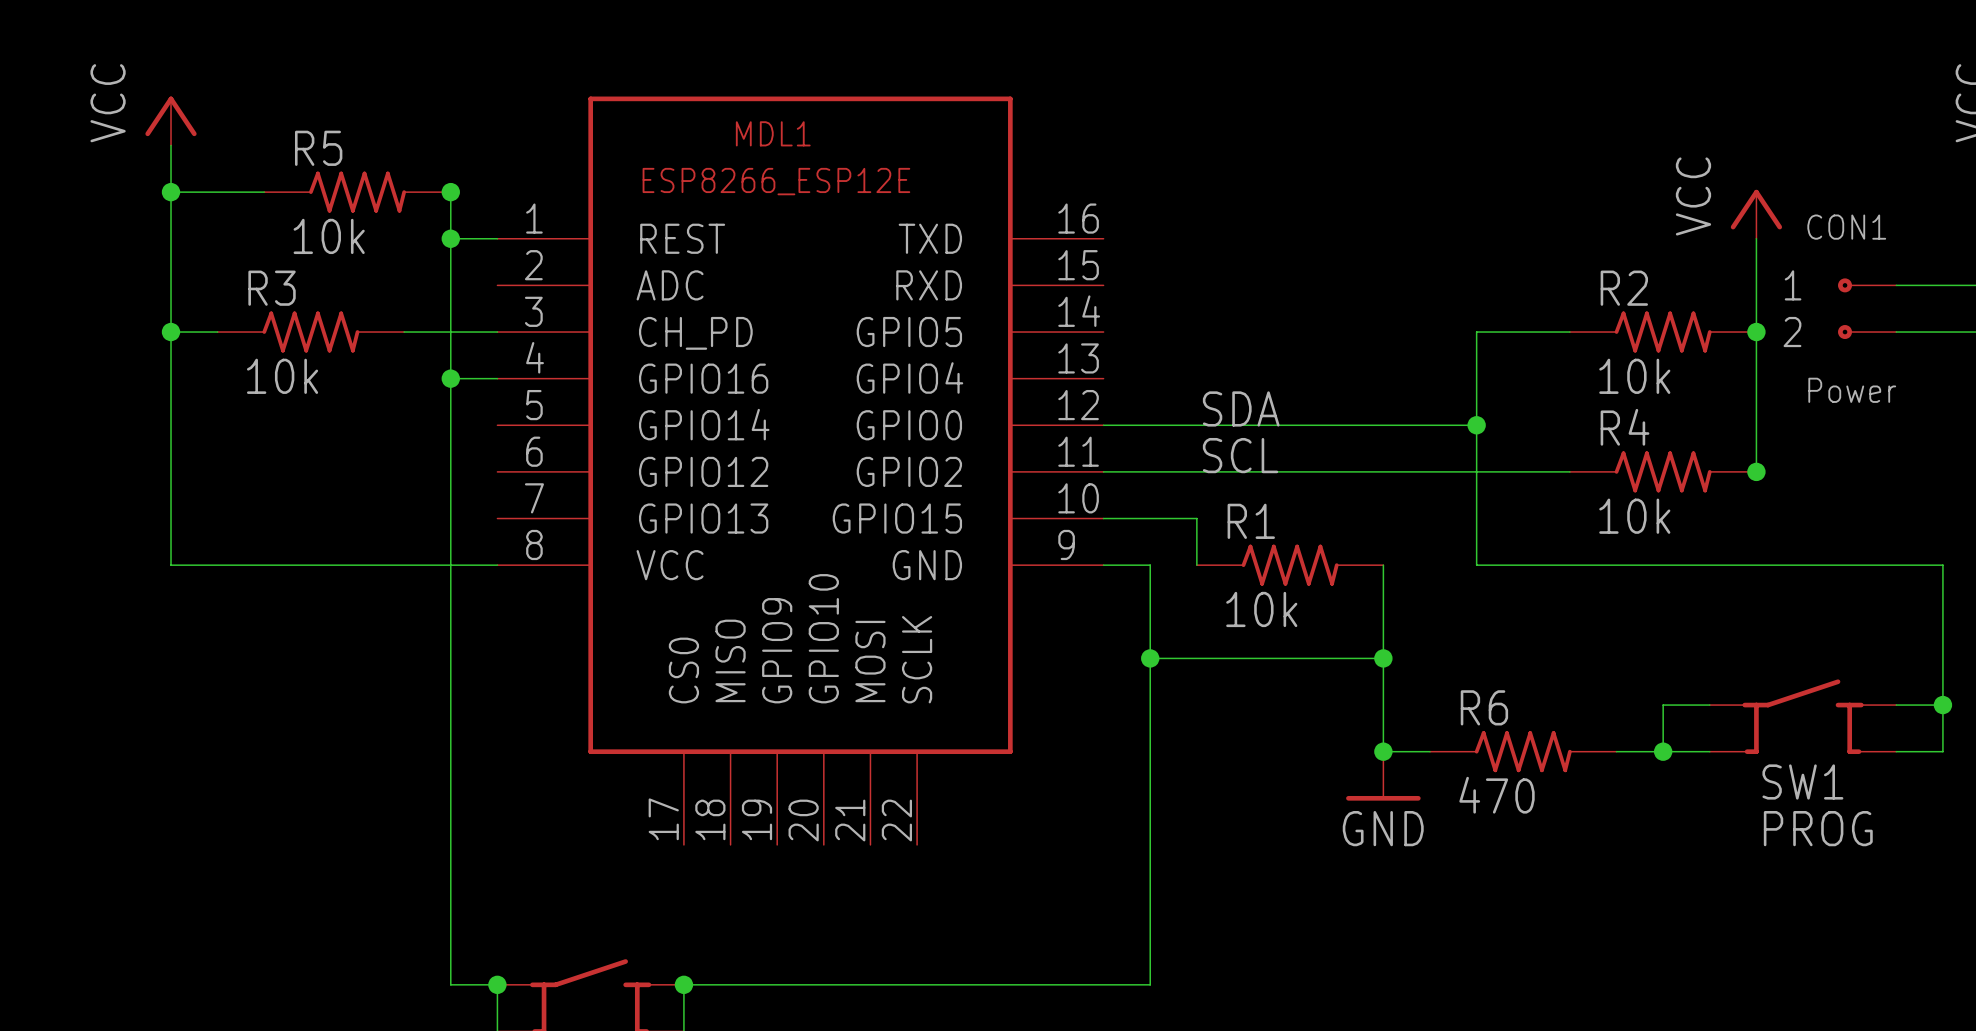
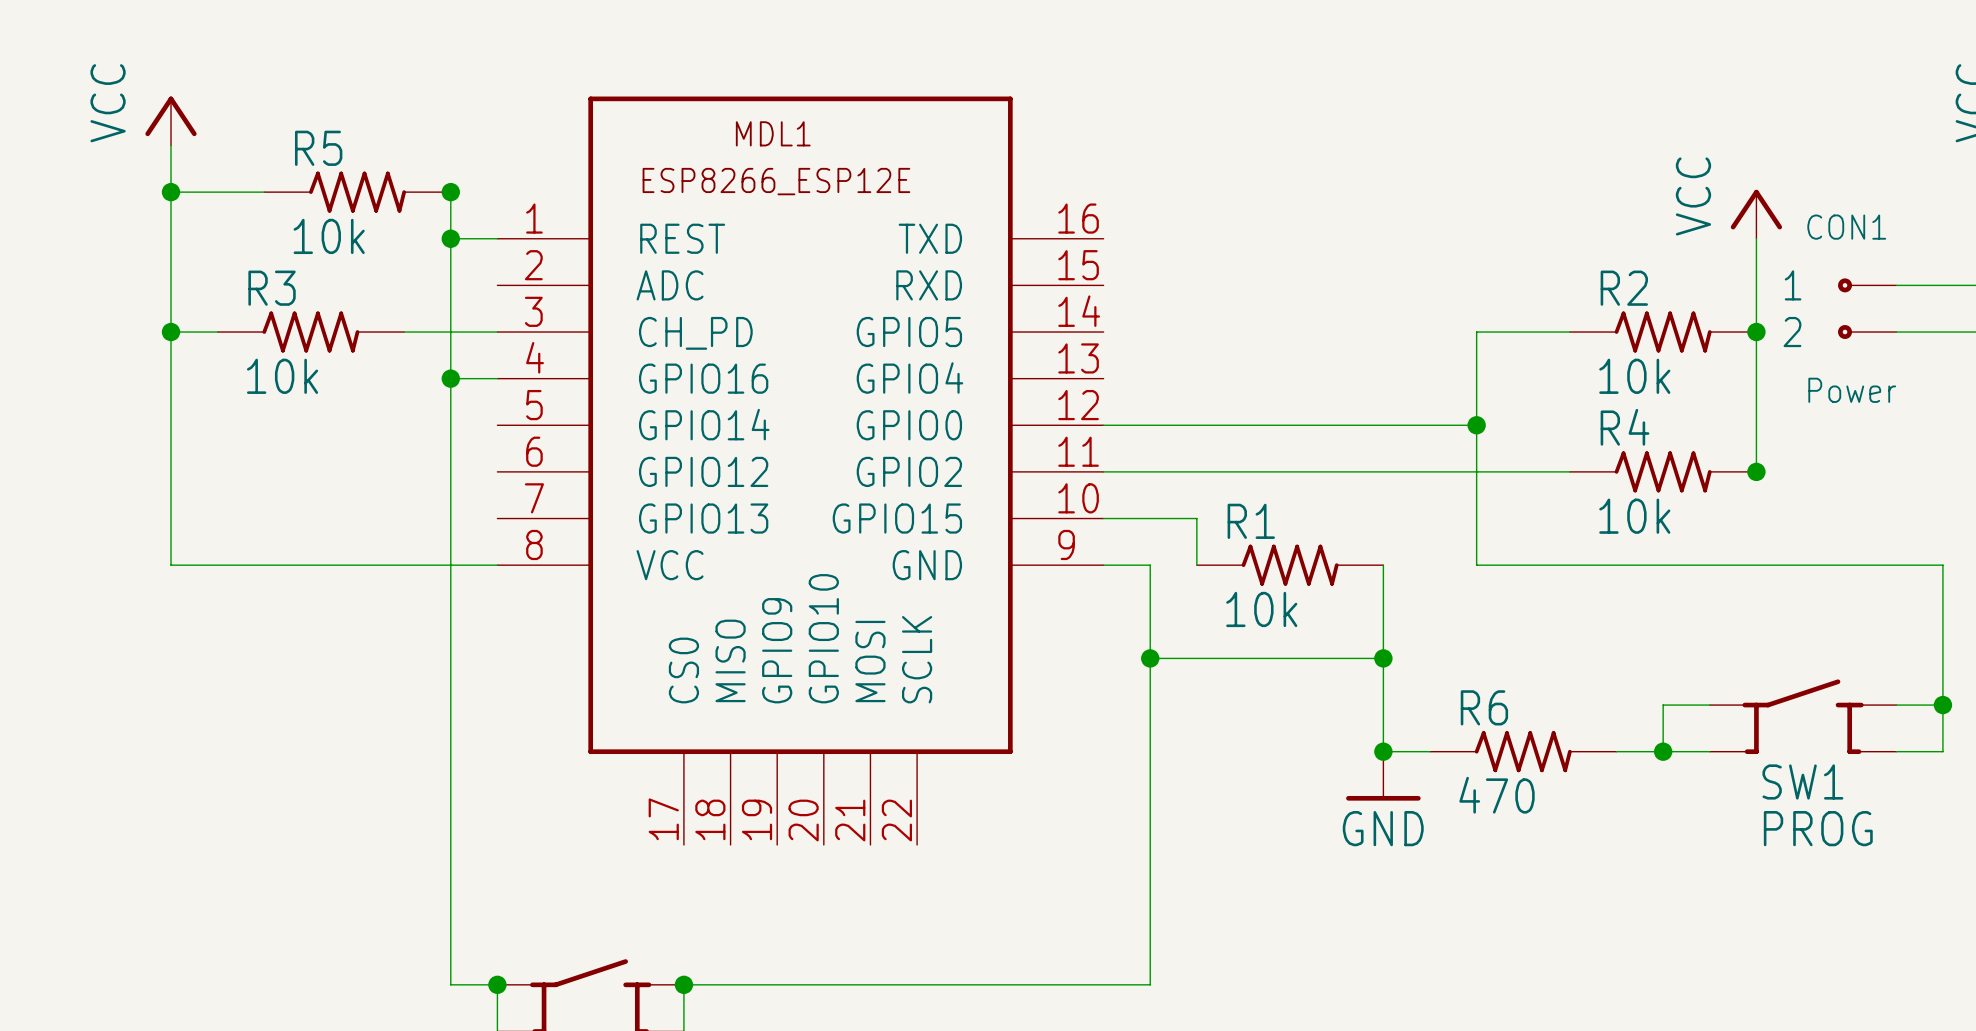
label: SDA (1241, 408) -> none
label: SCL (1240, 455) -> none

